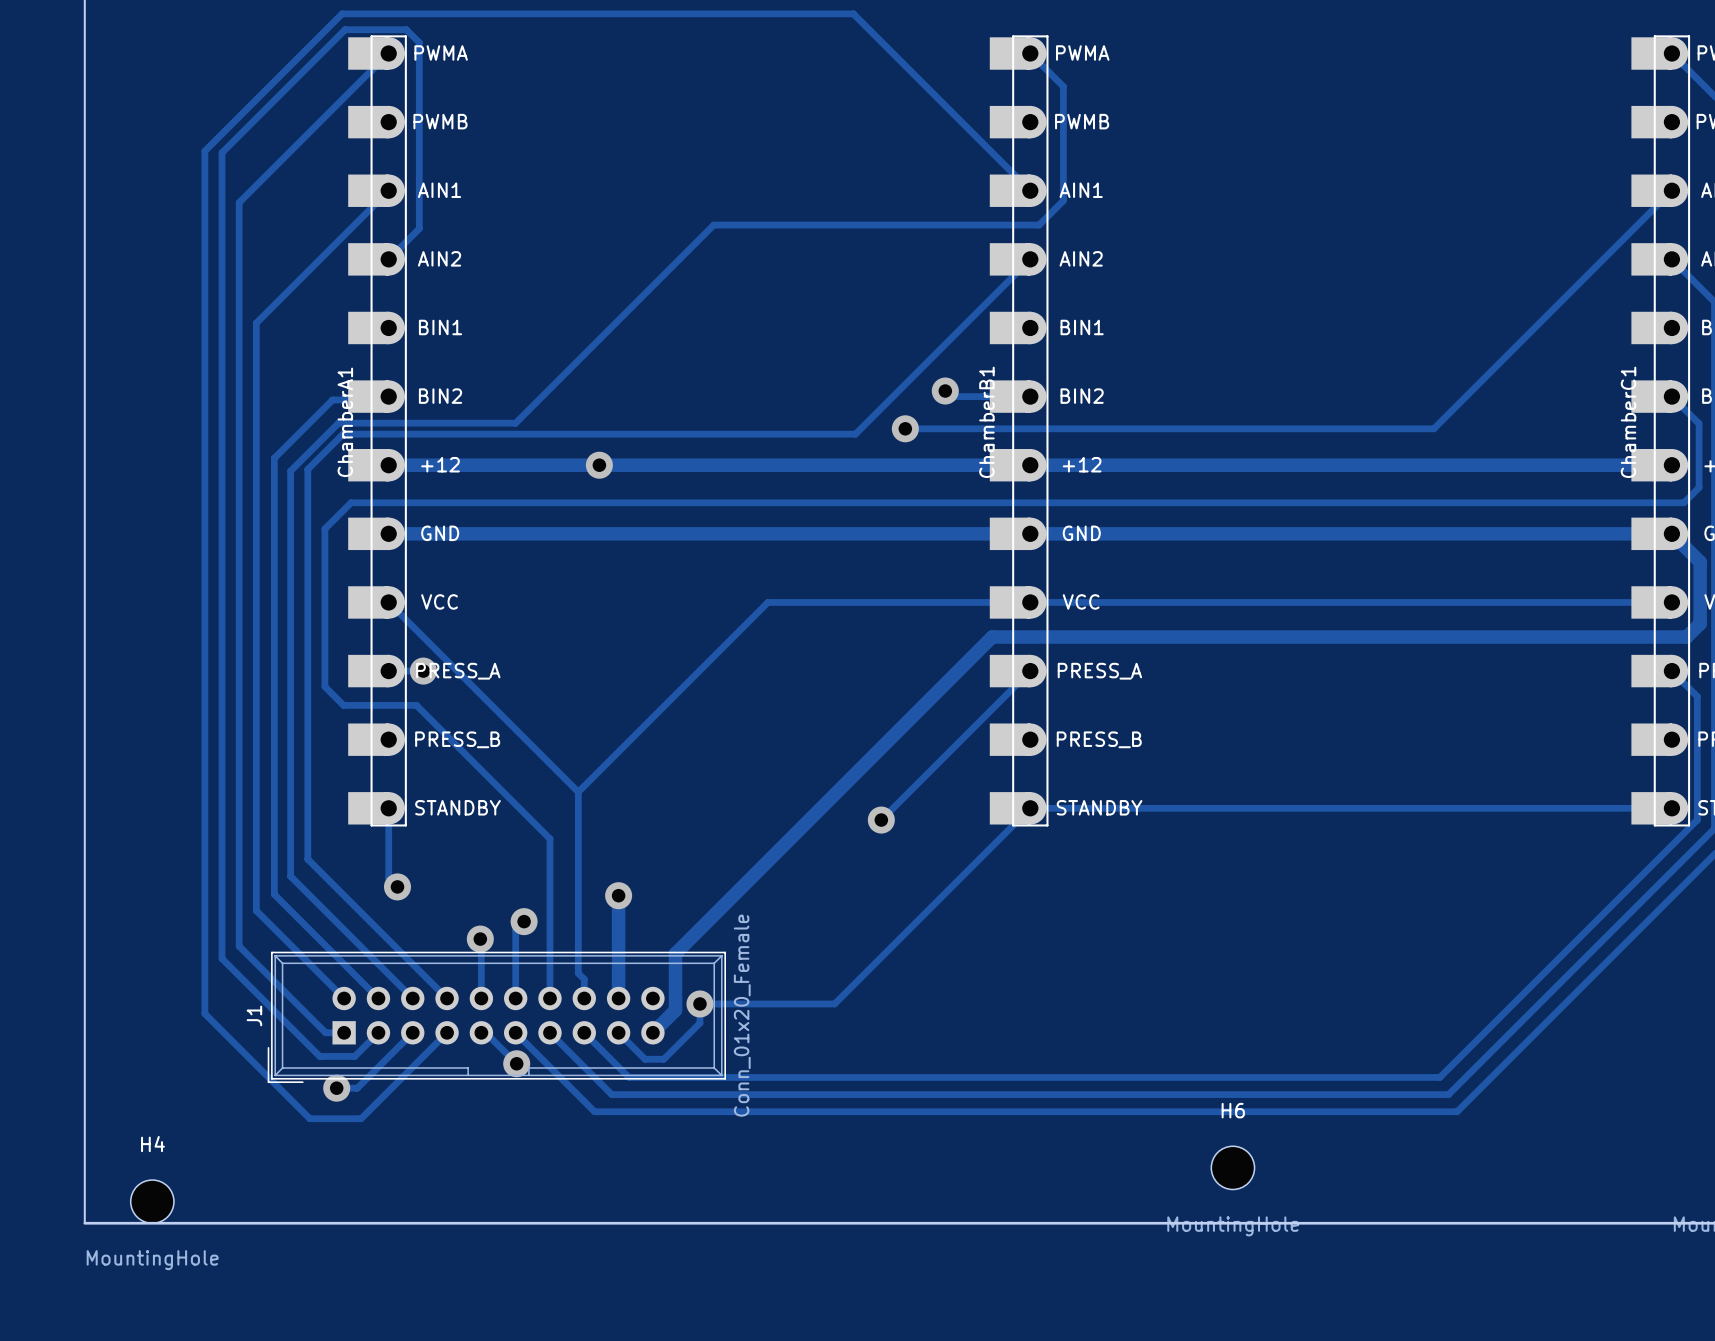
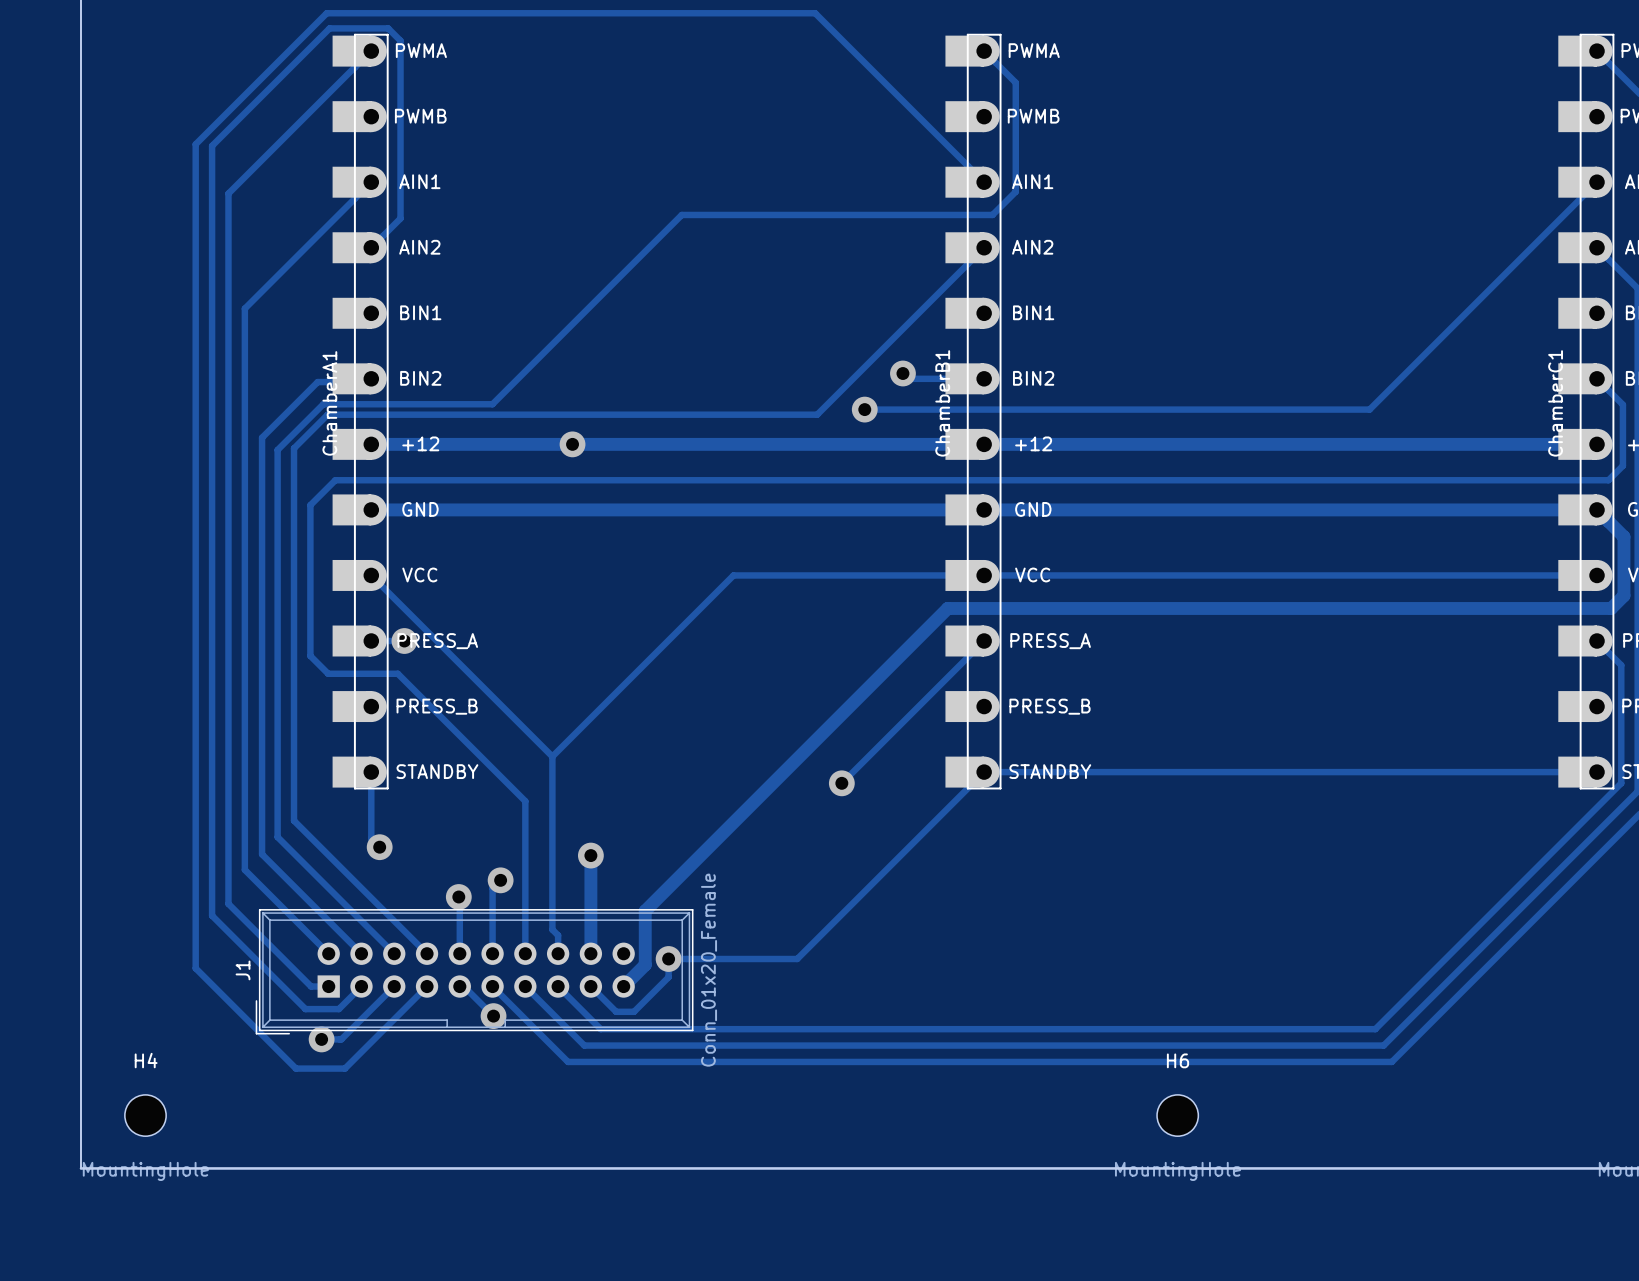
H4 position: (152, 1201) -> (145, 1115)

